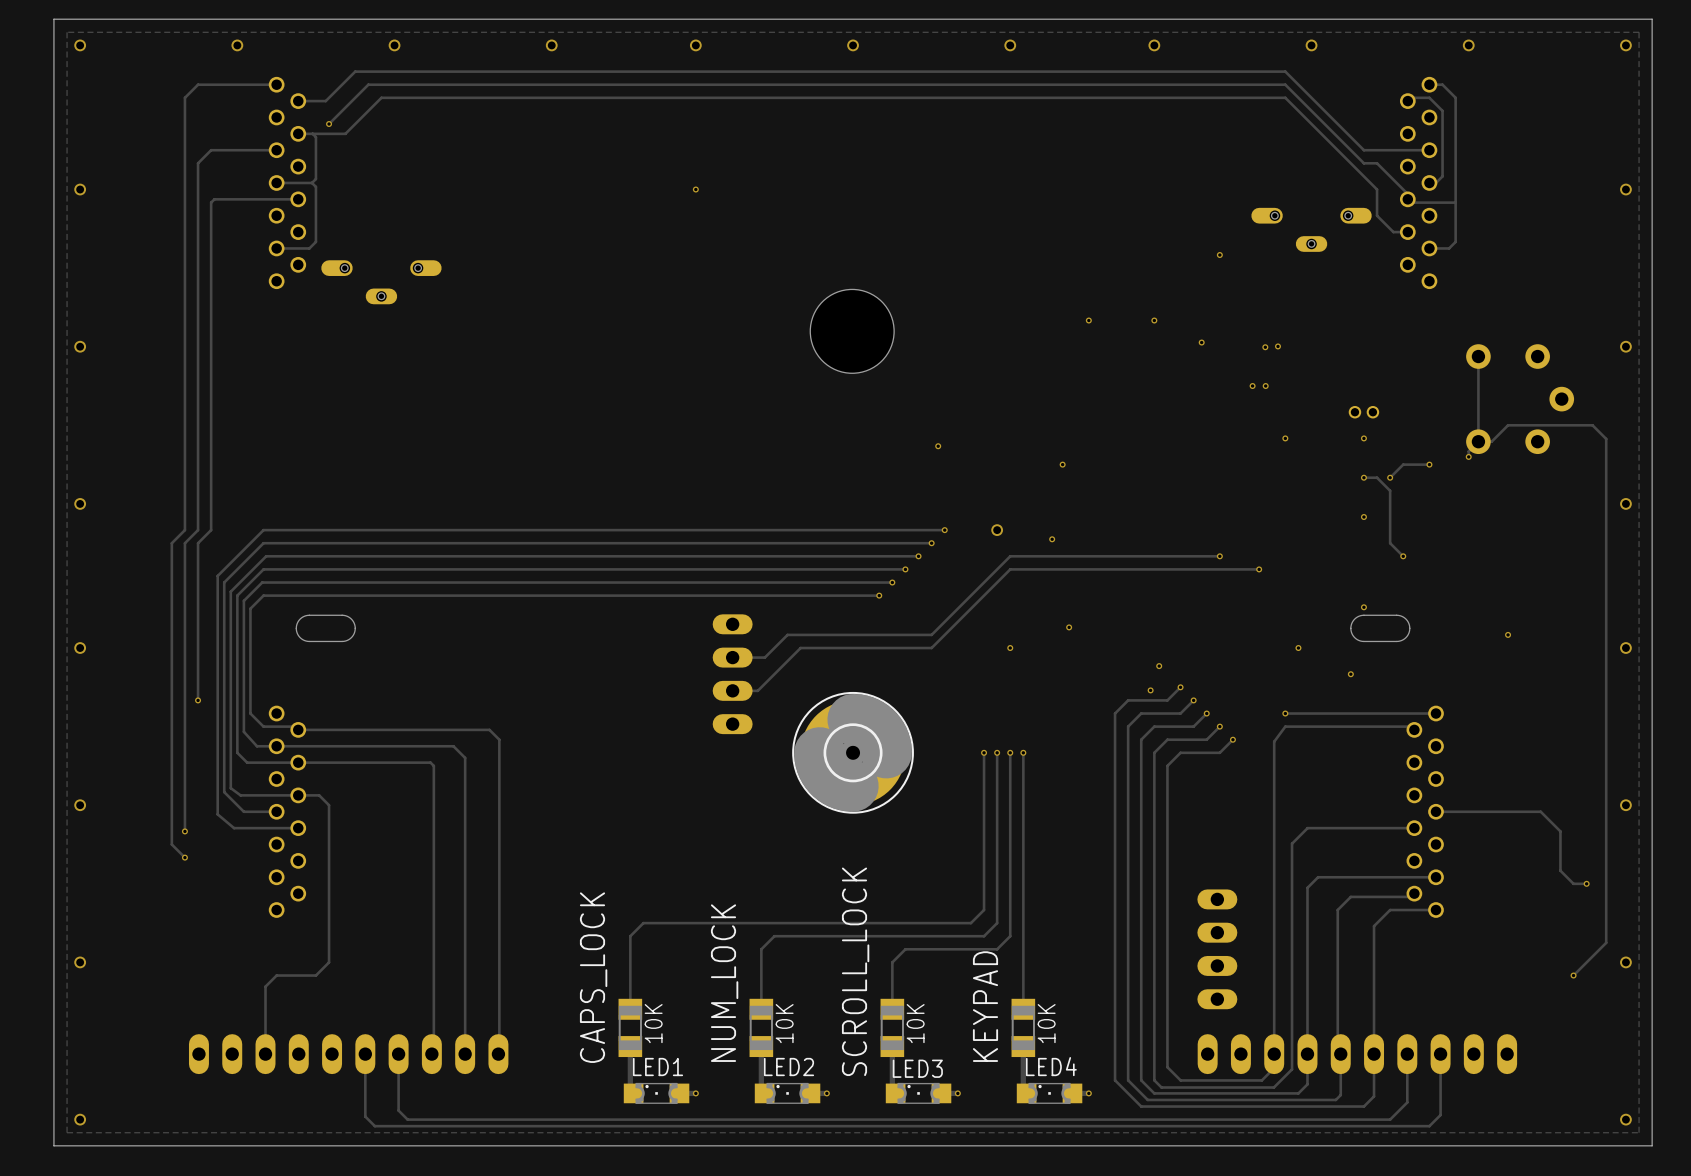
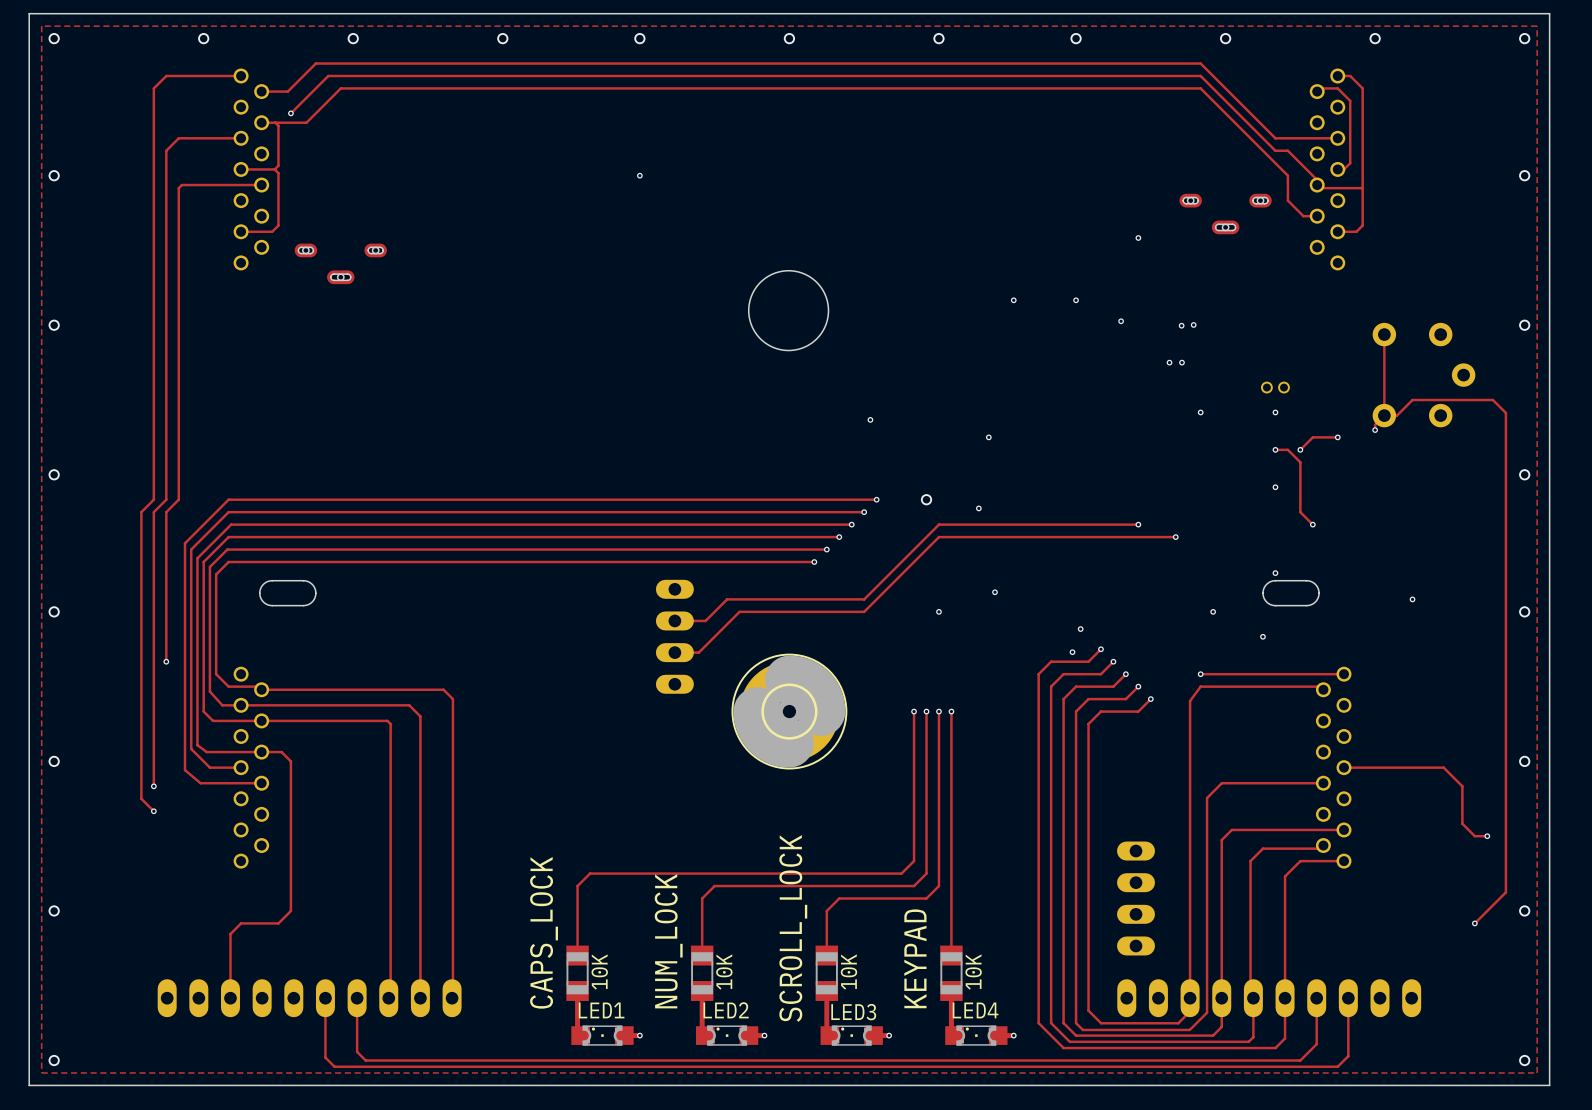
part footprint: [1251, 207, 1372, 252] -> [1179, 193, 1272, 235]
part footprint: [321, 260, 442, 305] -> [294, 243, 387, 285]

